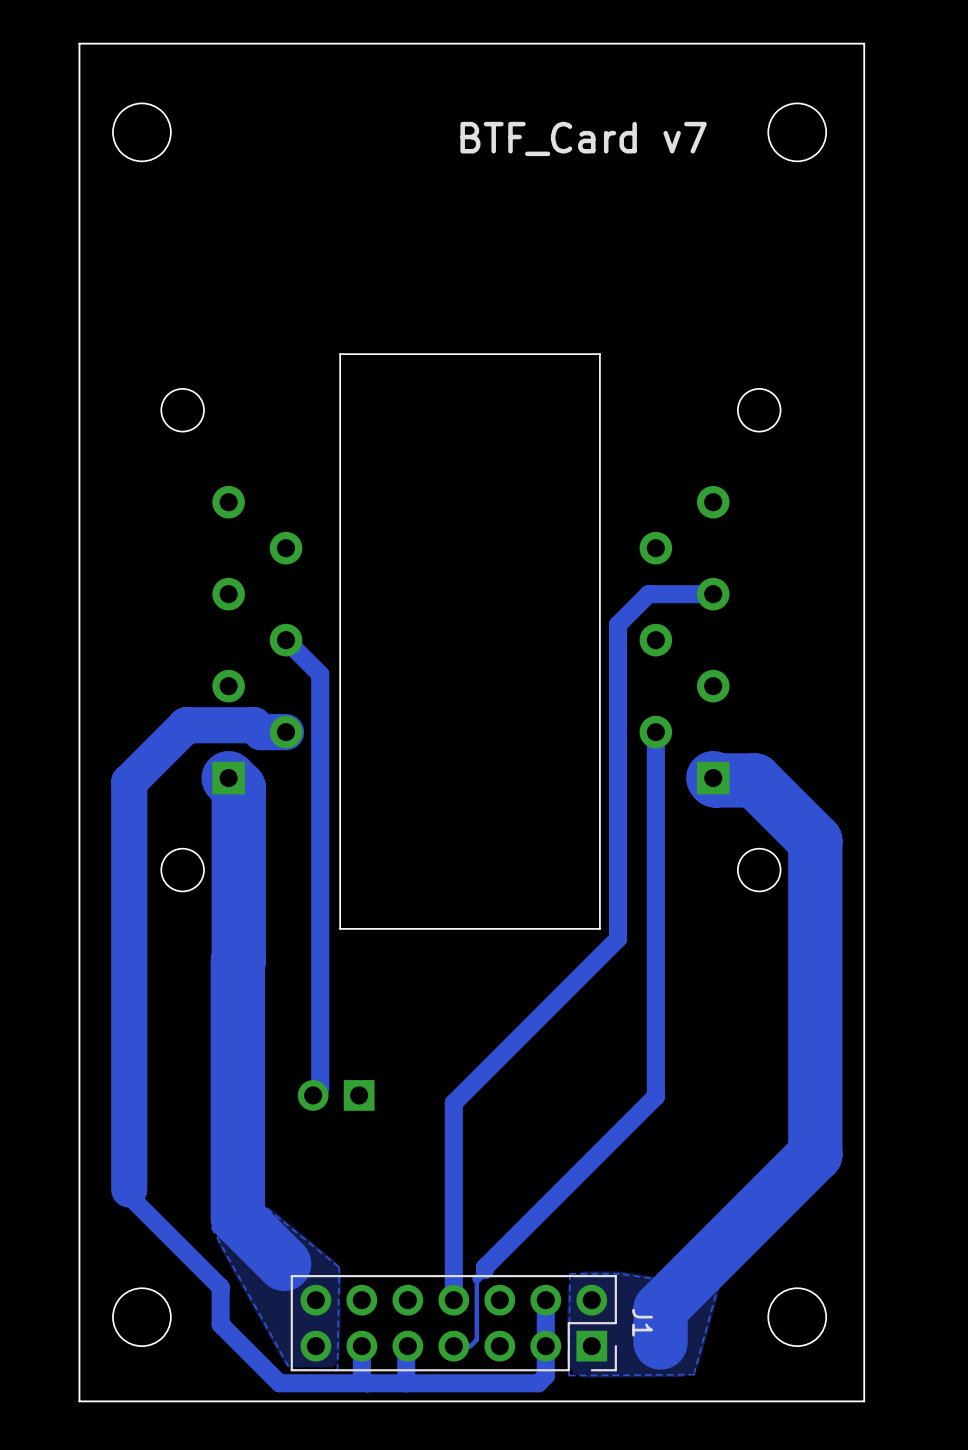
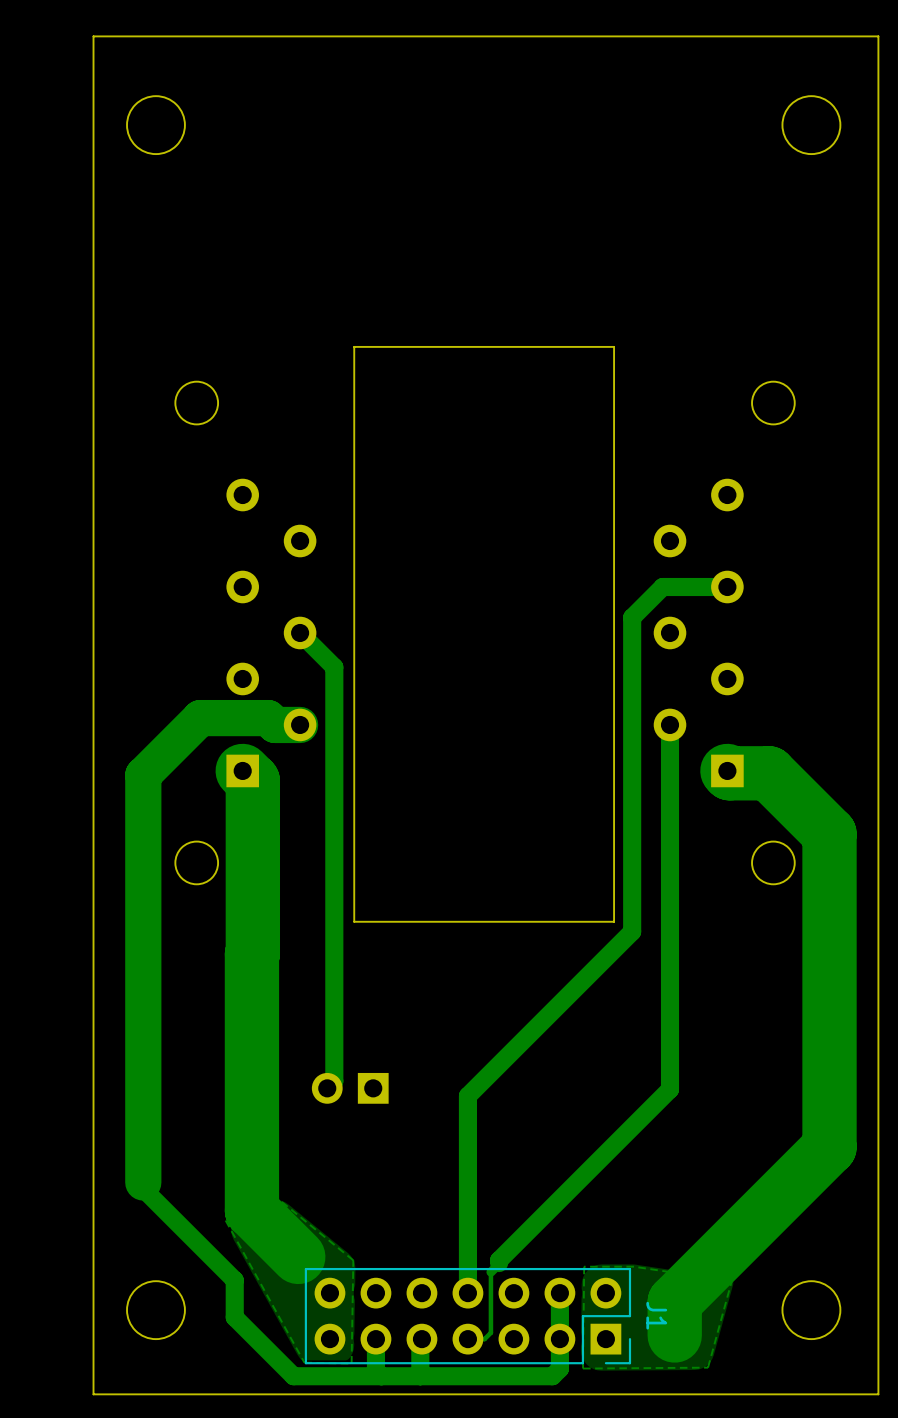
text: BTF_Card v7 (583, 138) -> none

